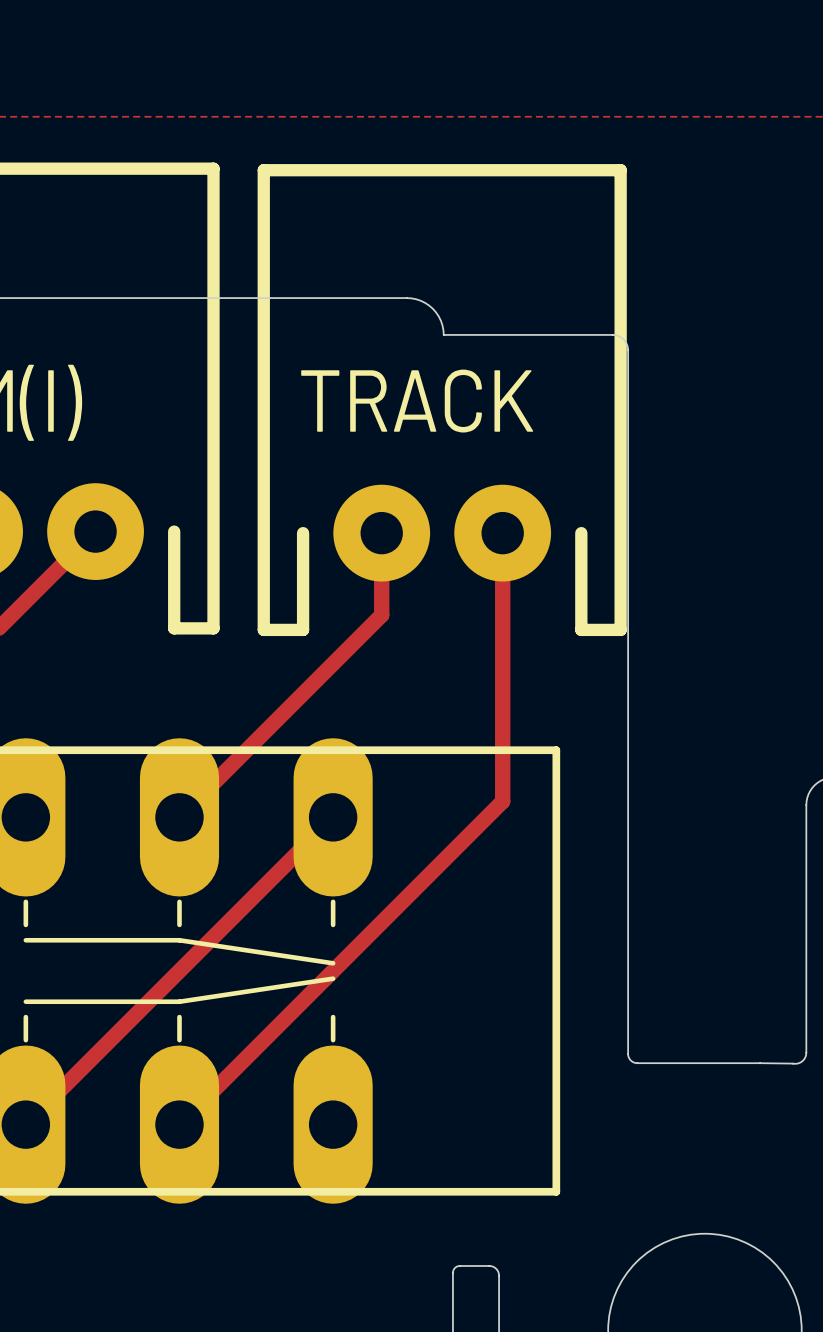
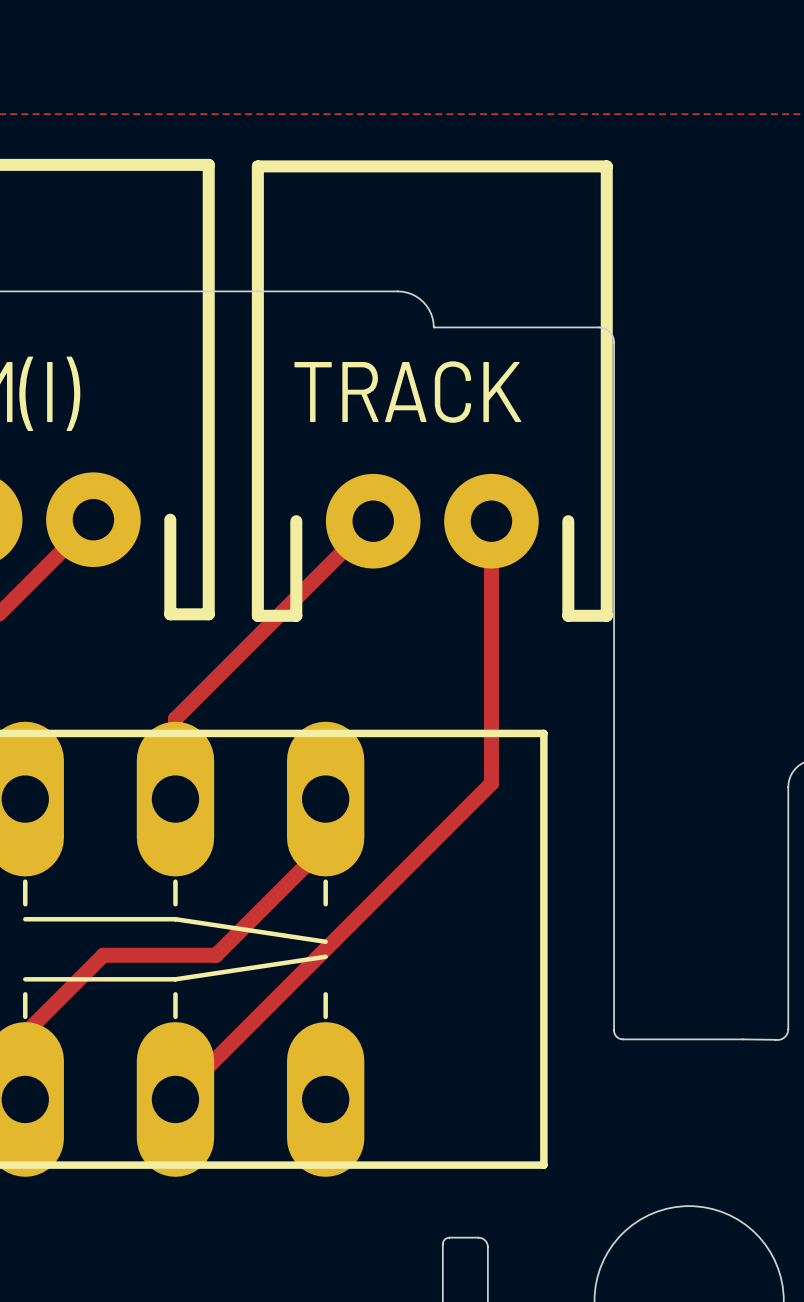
track: (381, 533) (381, 615) (179, 817) -> (373, 521) (175, 718) (175, 799)
track: (333, 817) (25, 1124) -> (325, 799) (325, 845) (216, 955) (103, 955) (25, 1033) (25, 1099)

